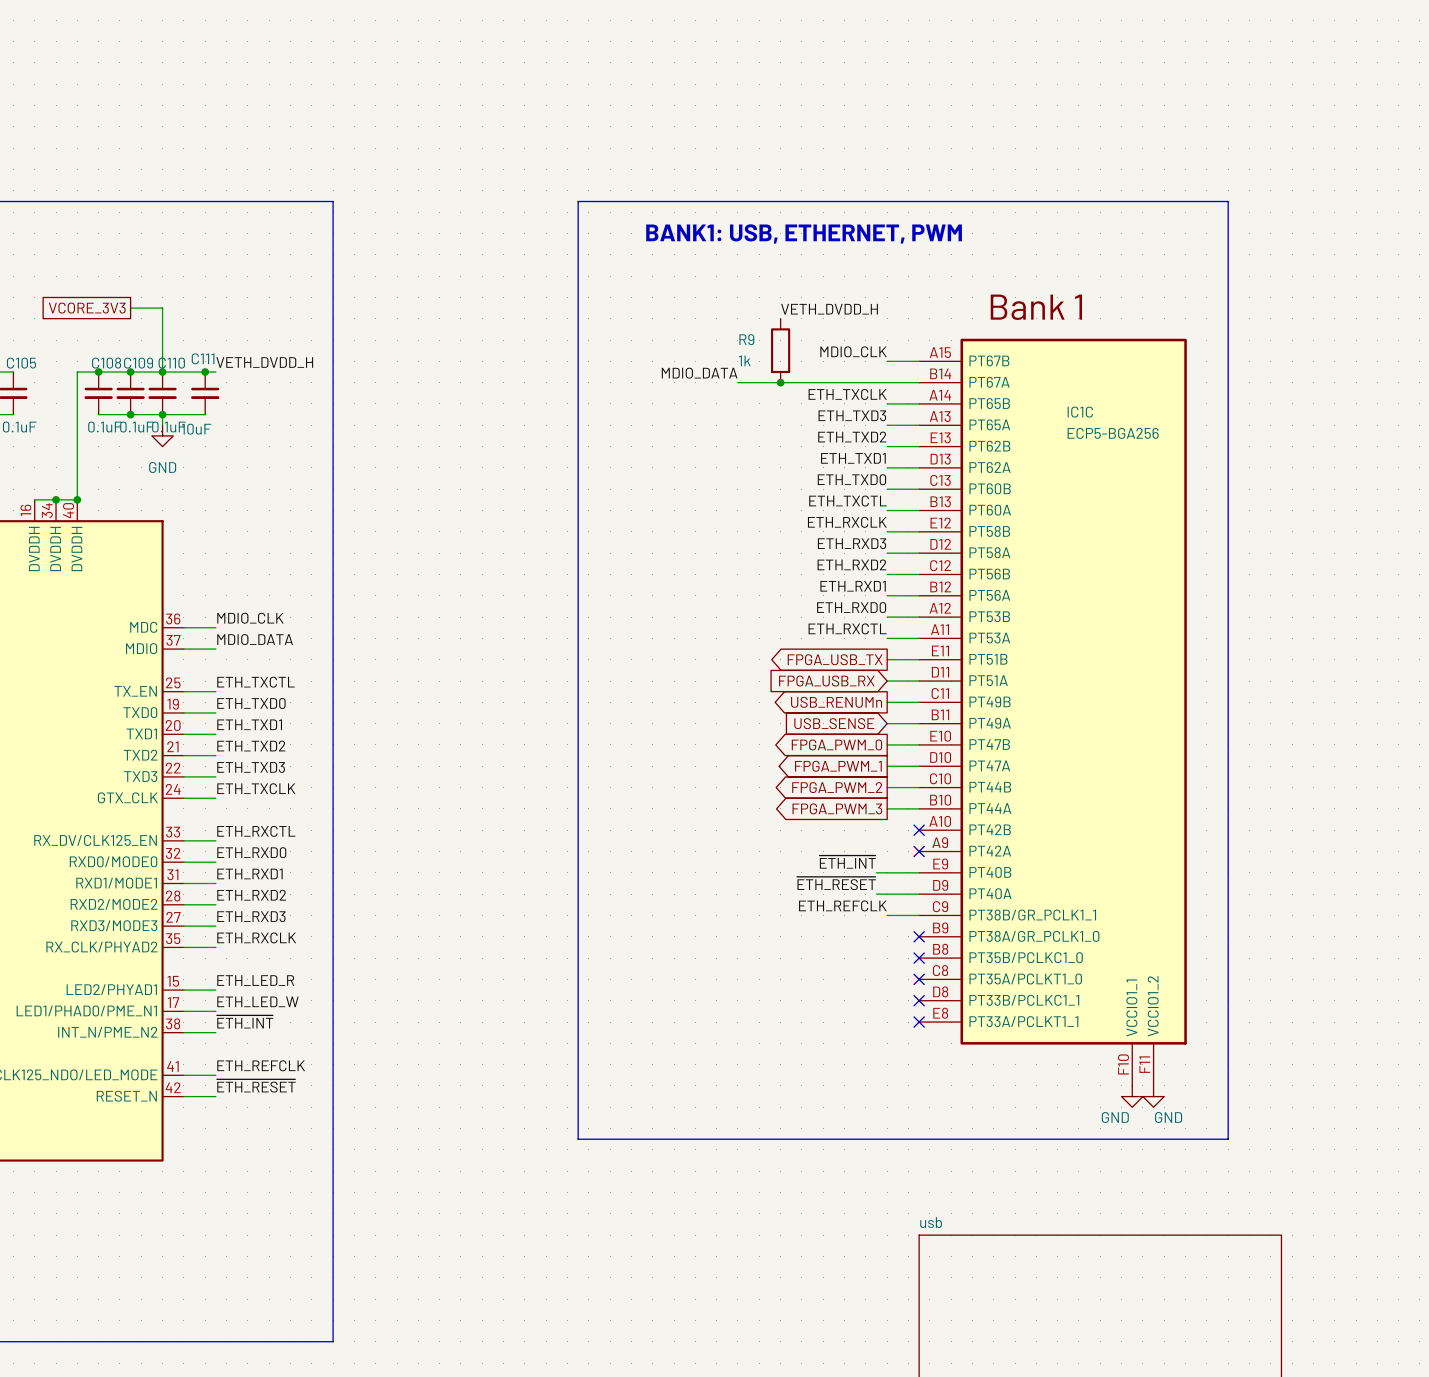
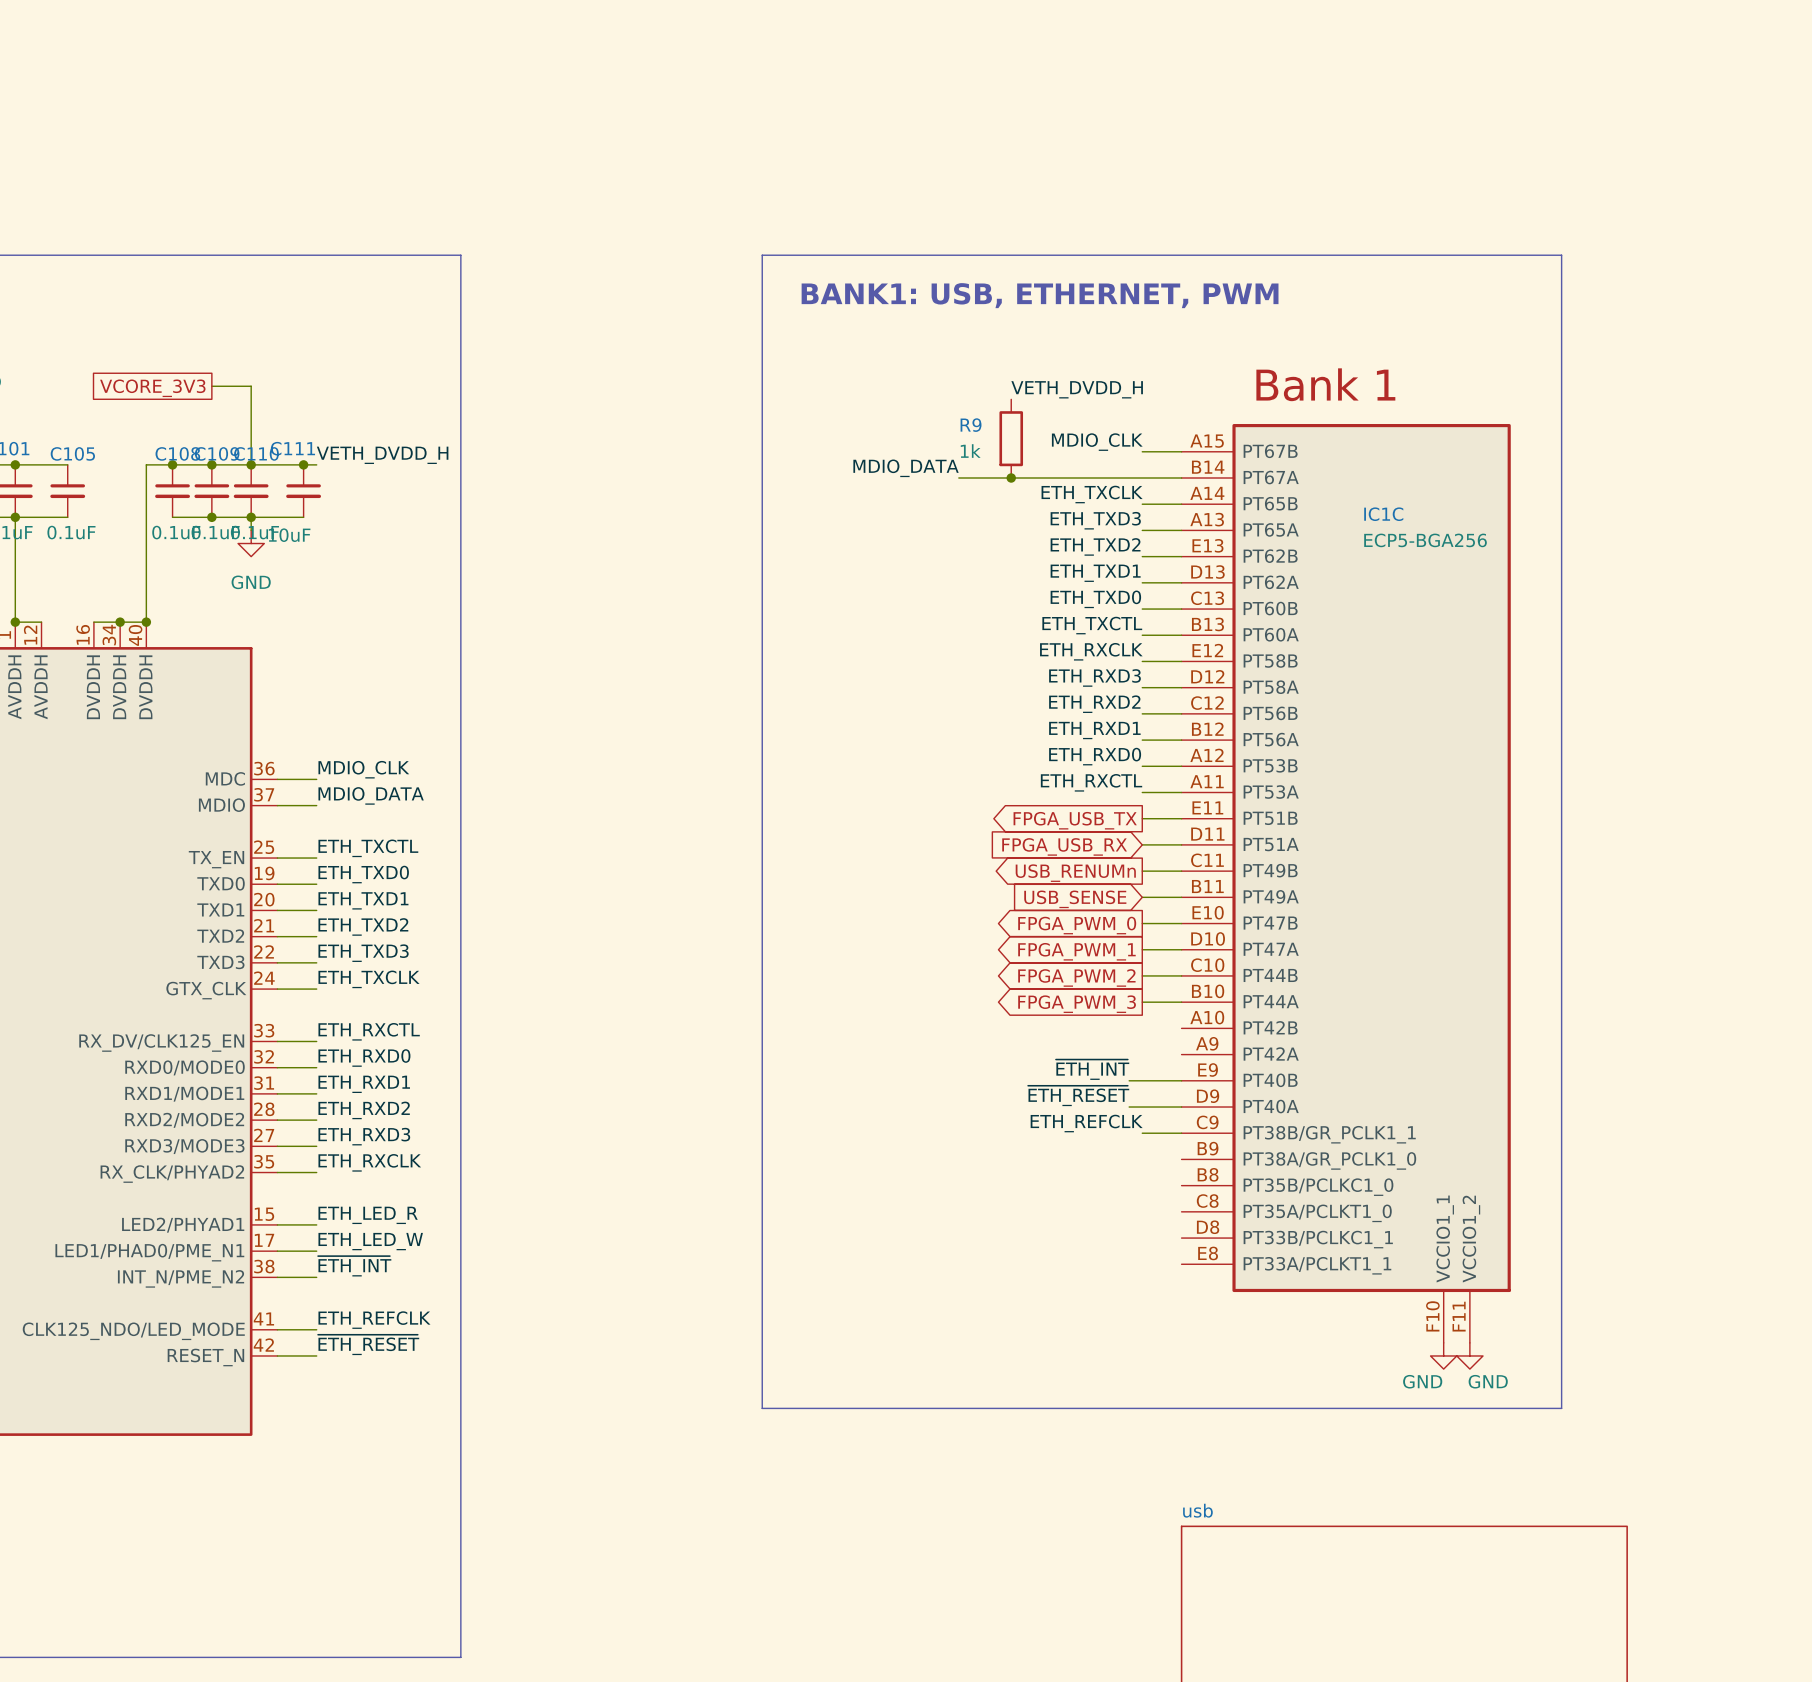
no-connect mark: (919, 830) -> none
no-connect mark: (919, 851) -> none
no-connect mark: (919, 936) -> none
no-connect mark: (919, 958) -> none
no-connect mark: (919, 979) -> none
no-connect mark: (919, 1000) -> none
no-connect mark: (919, 1022) -> none

